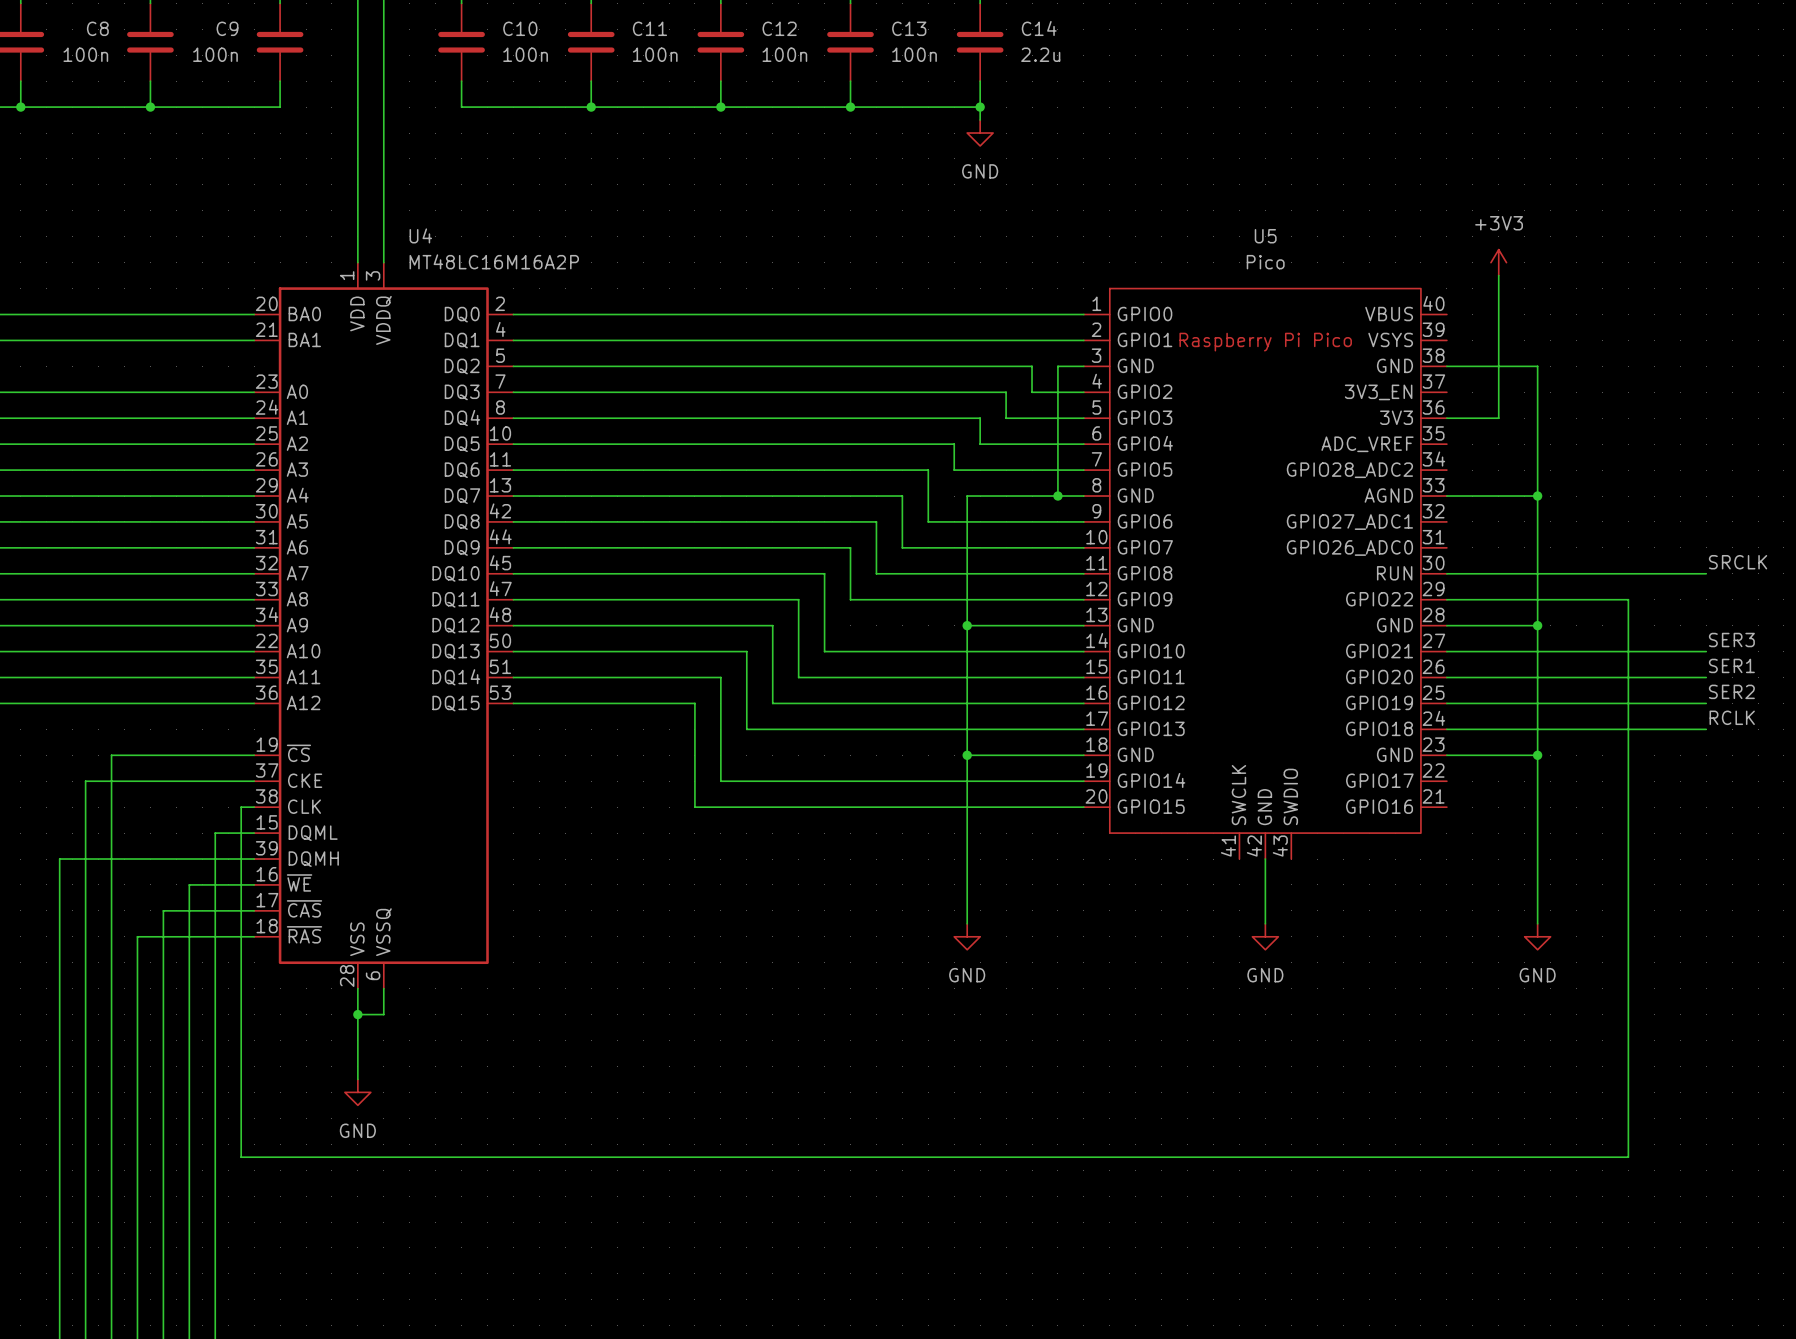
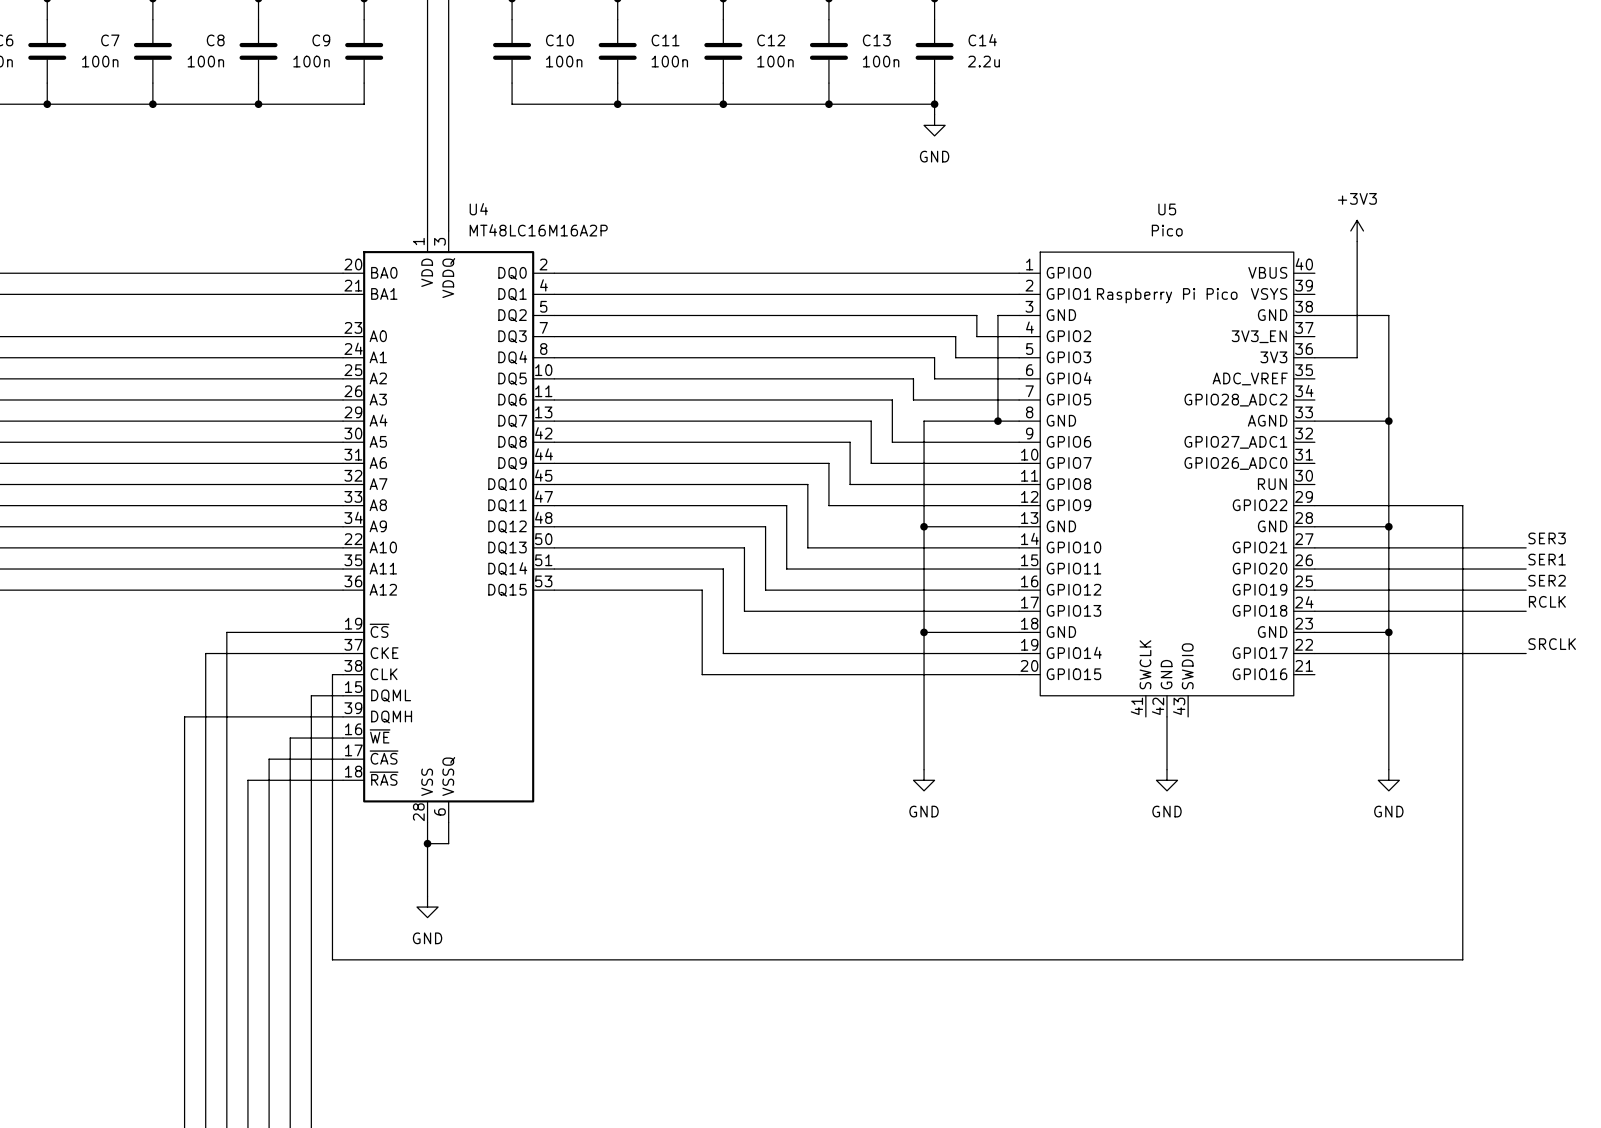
label position: SRCLK (1738, 562) -> SRCLK (1552, 644)
wire: (1446, 573) (1706, 573) -> (1314, 653) (1526, 653)

